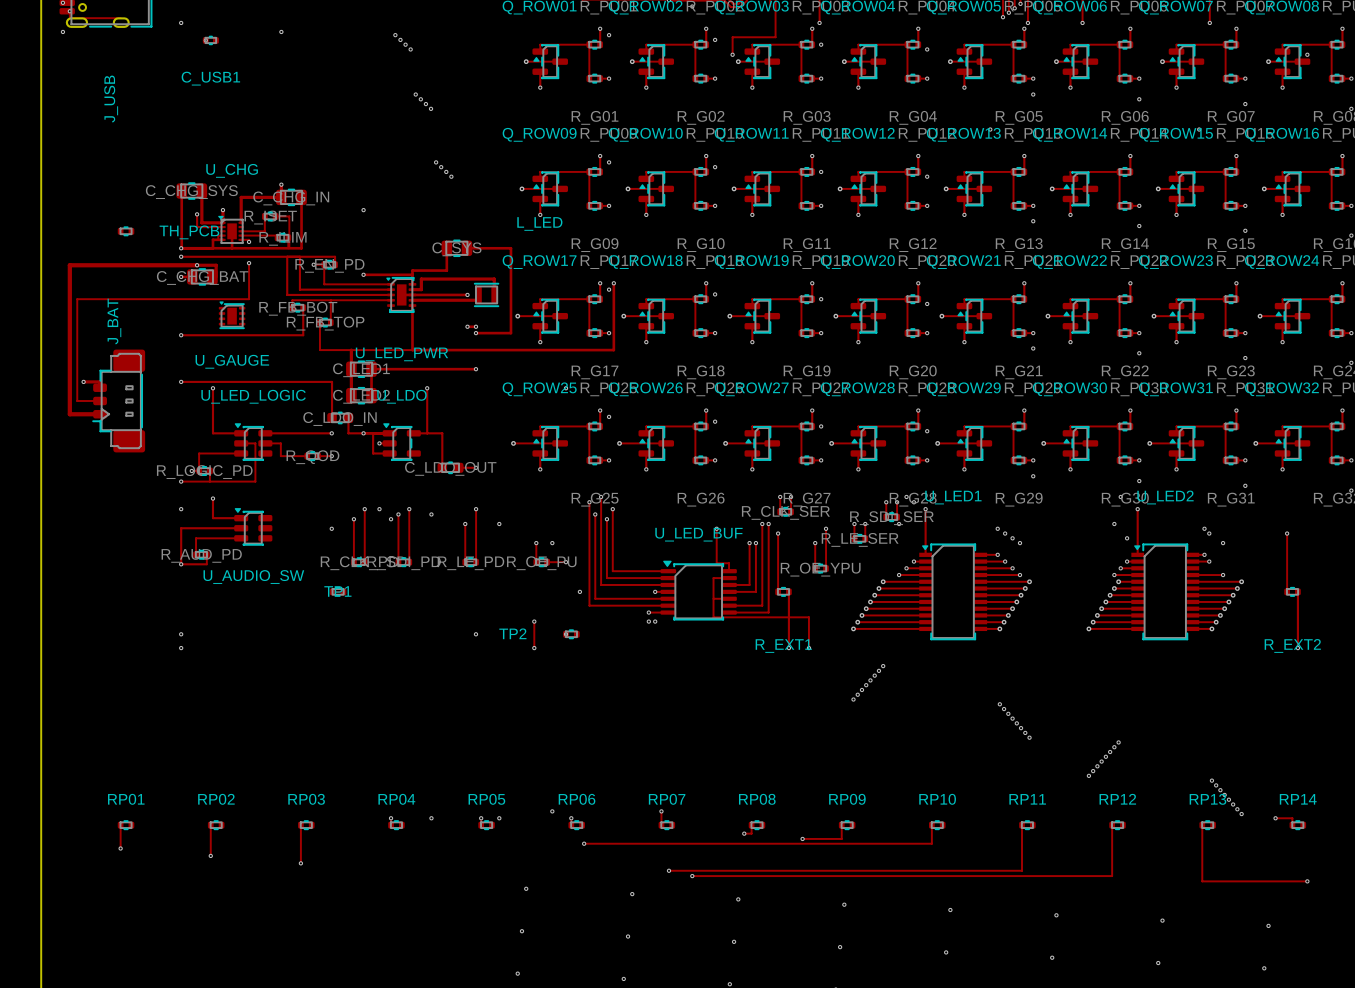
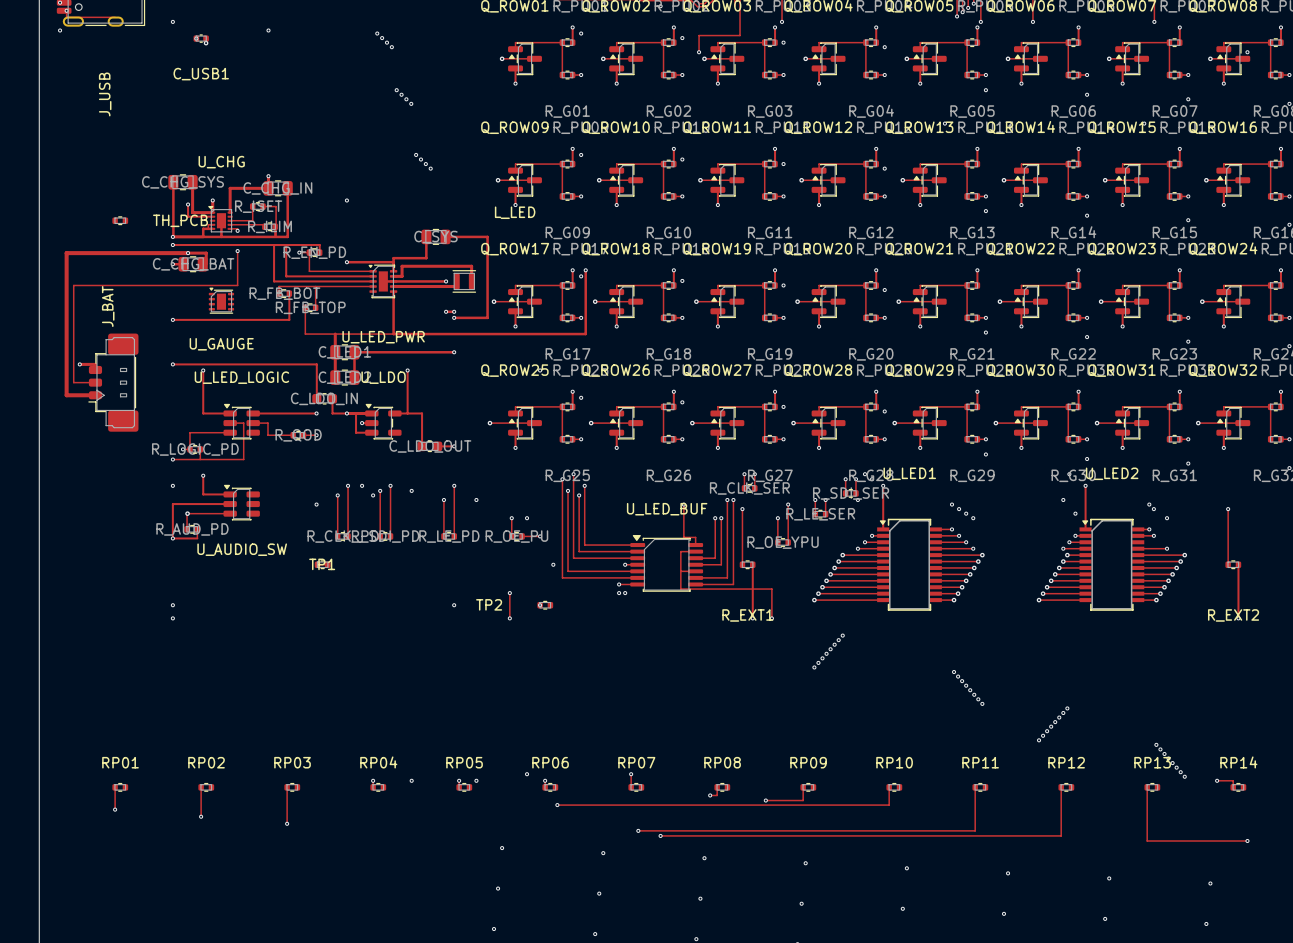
via: none -> (206, 43)
via: none -> (187, 513)

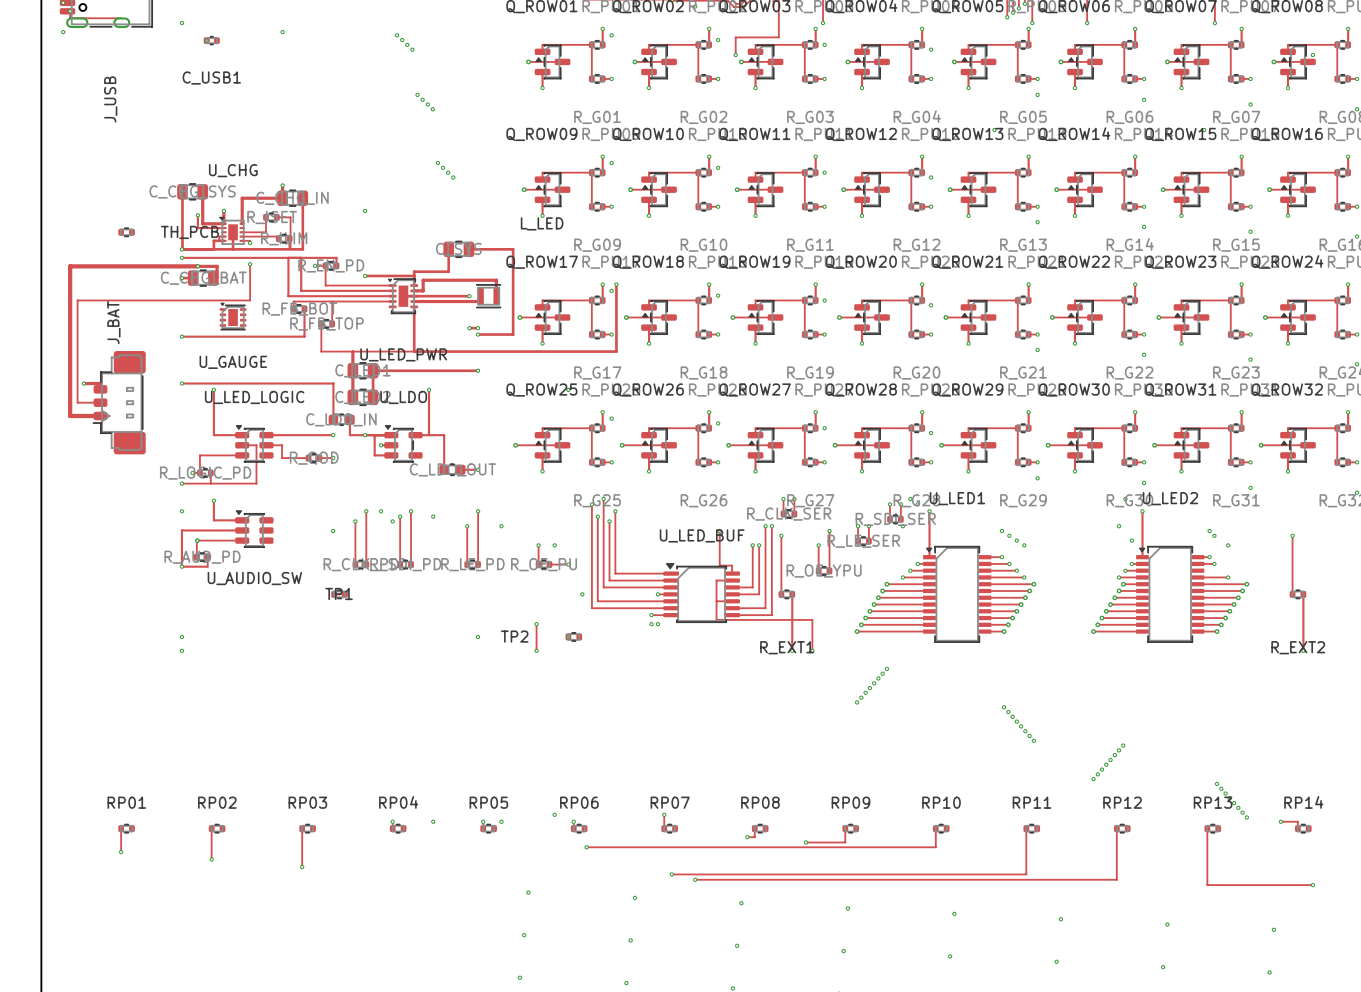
via: (206, 43) -> none

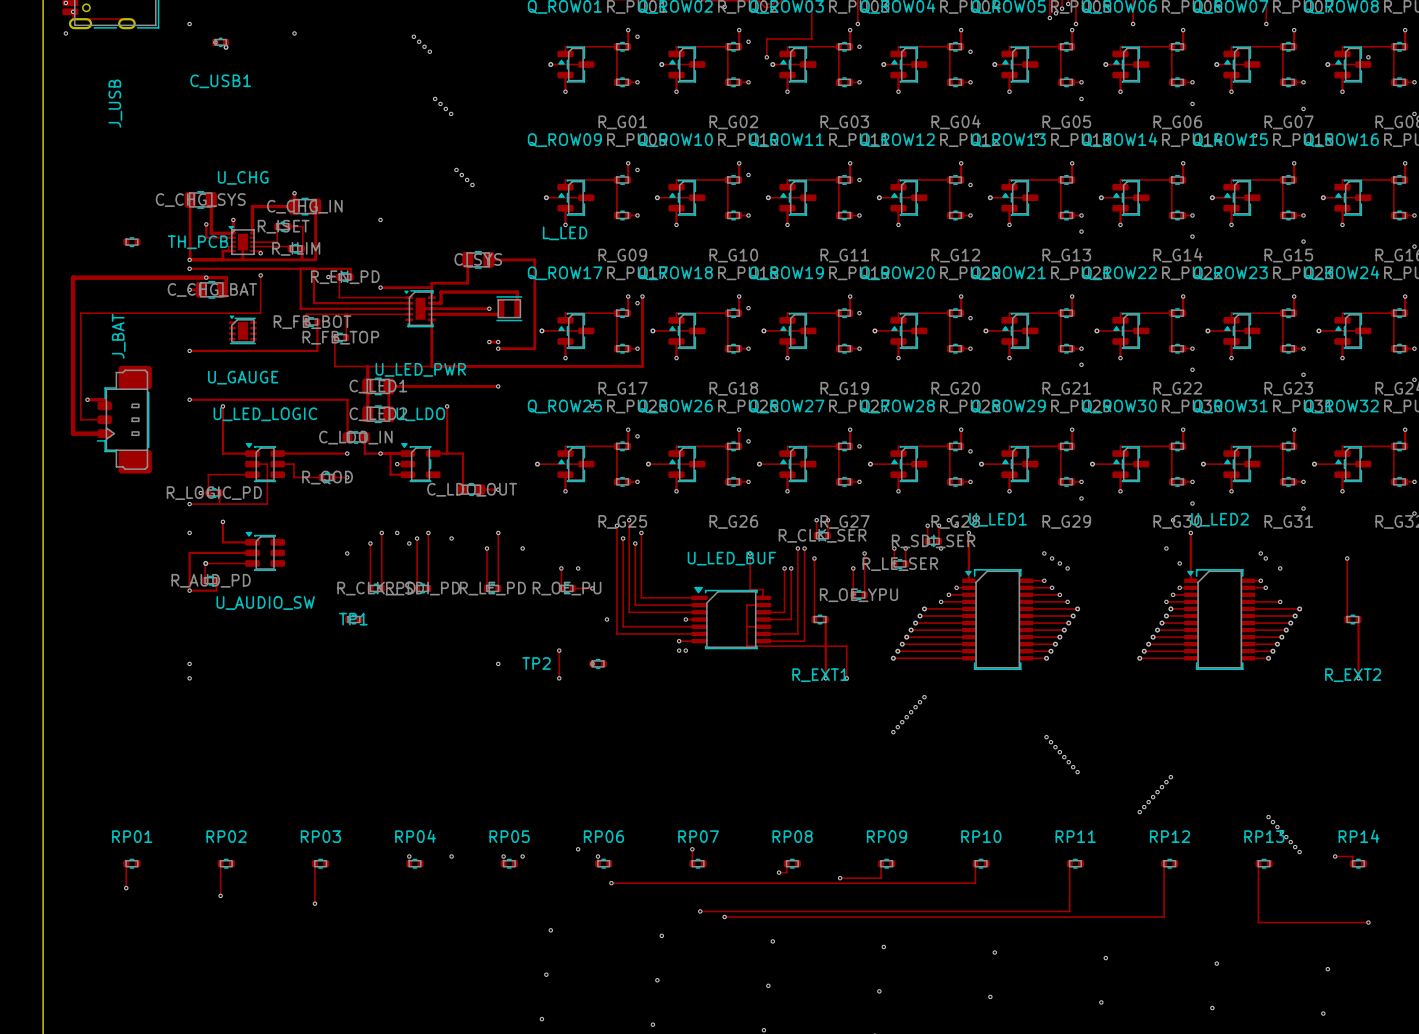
via: none -> (226, 47)

